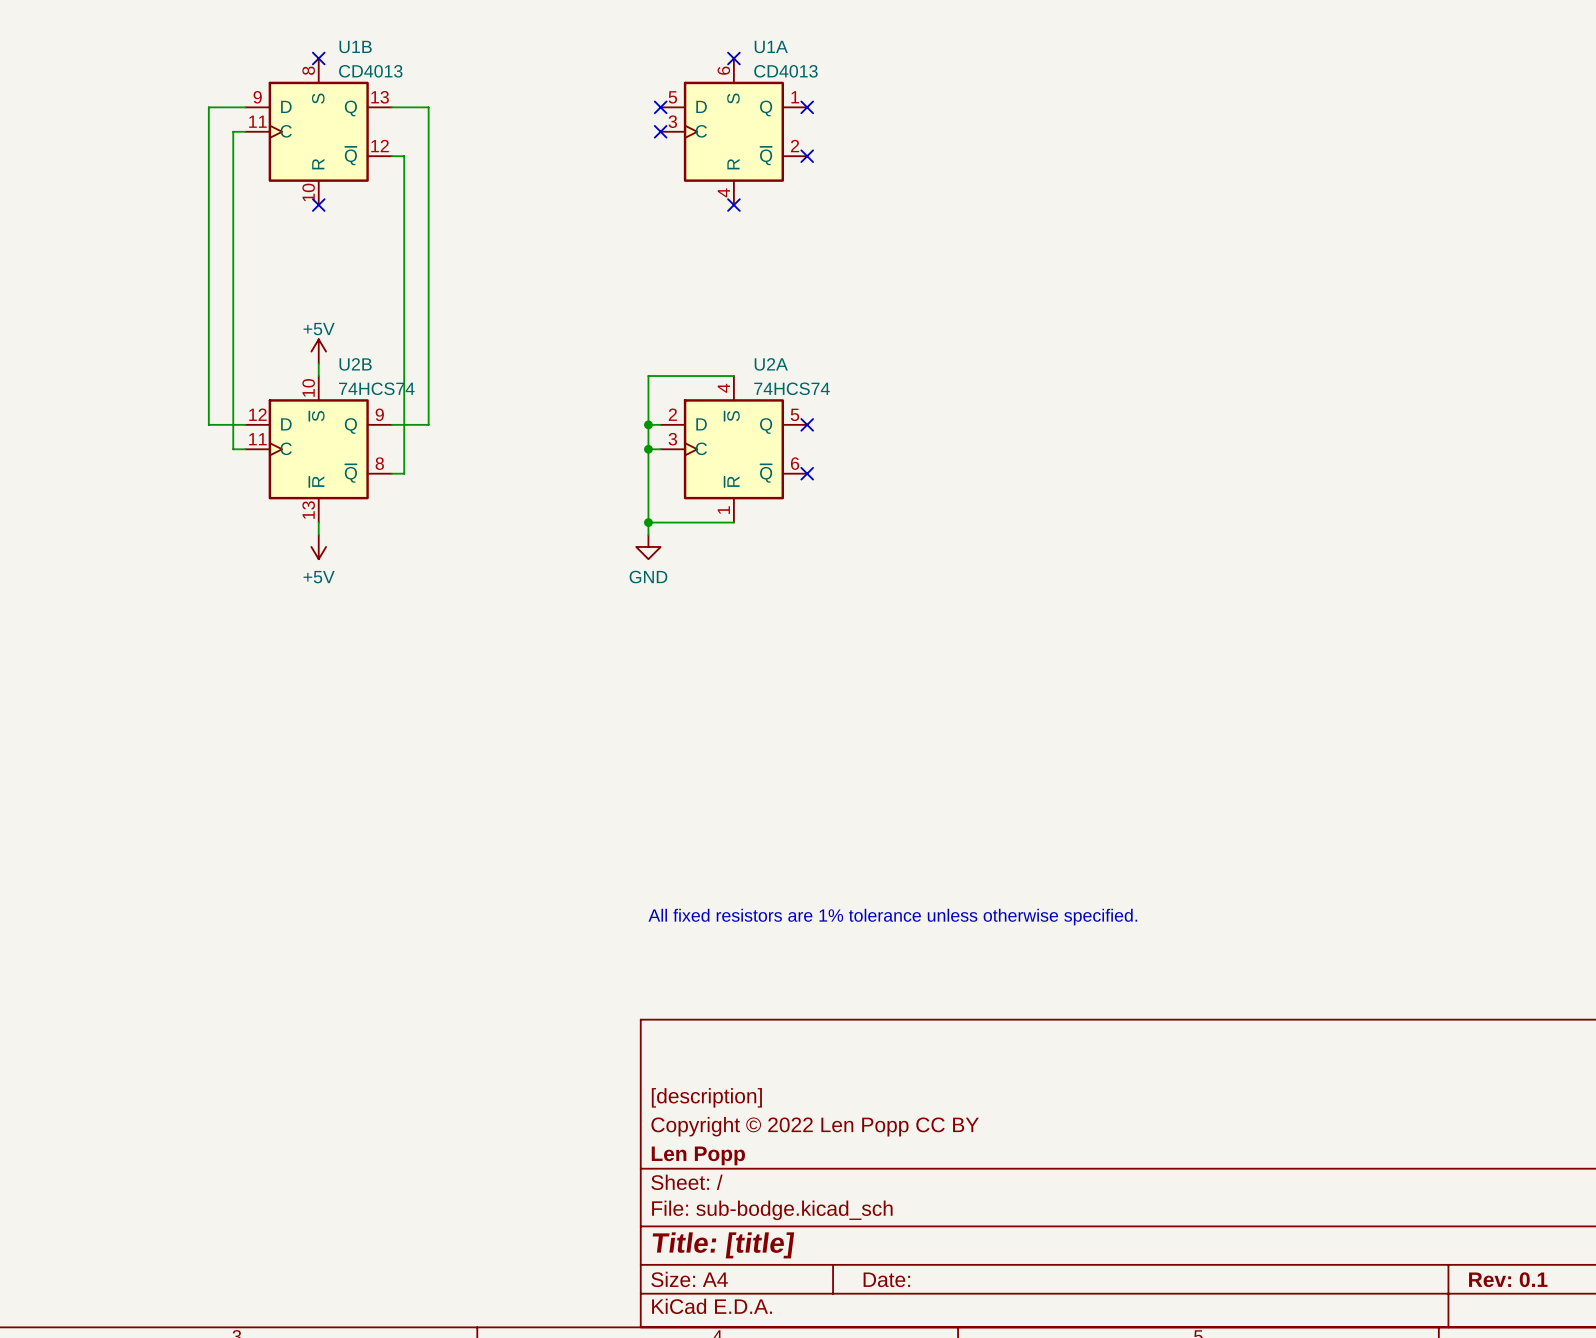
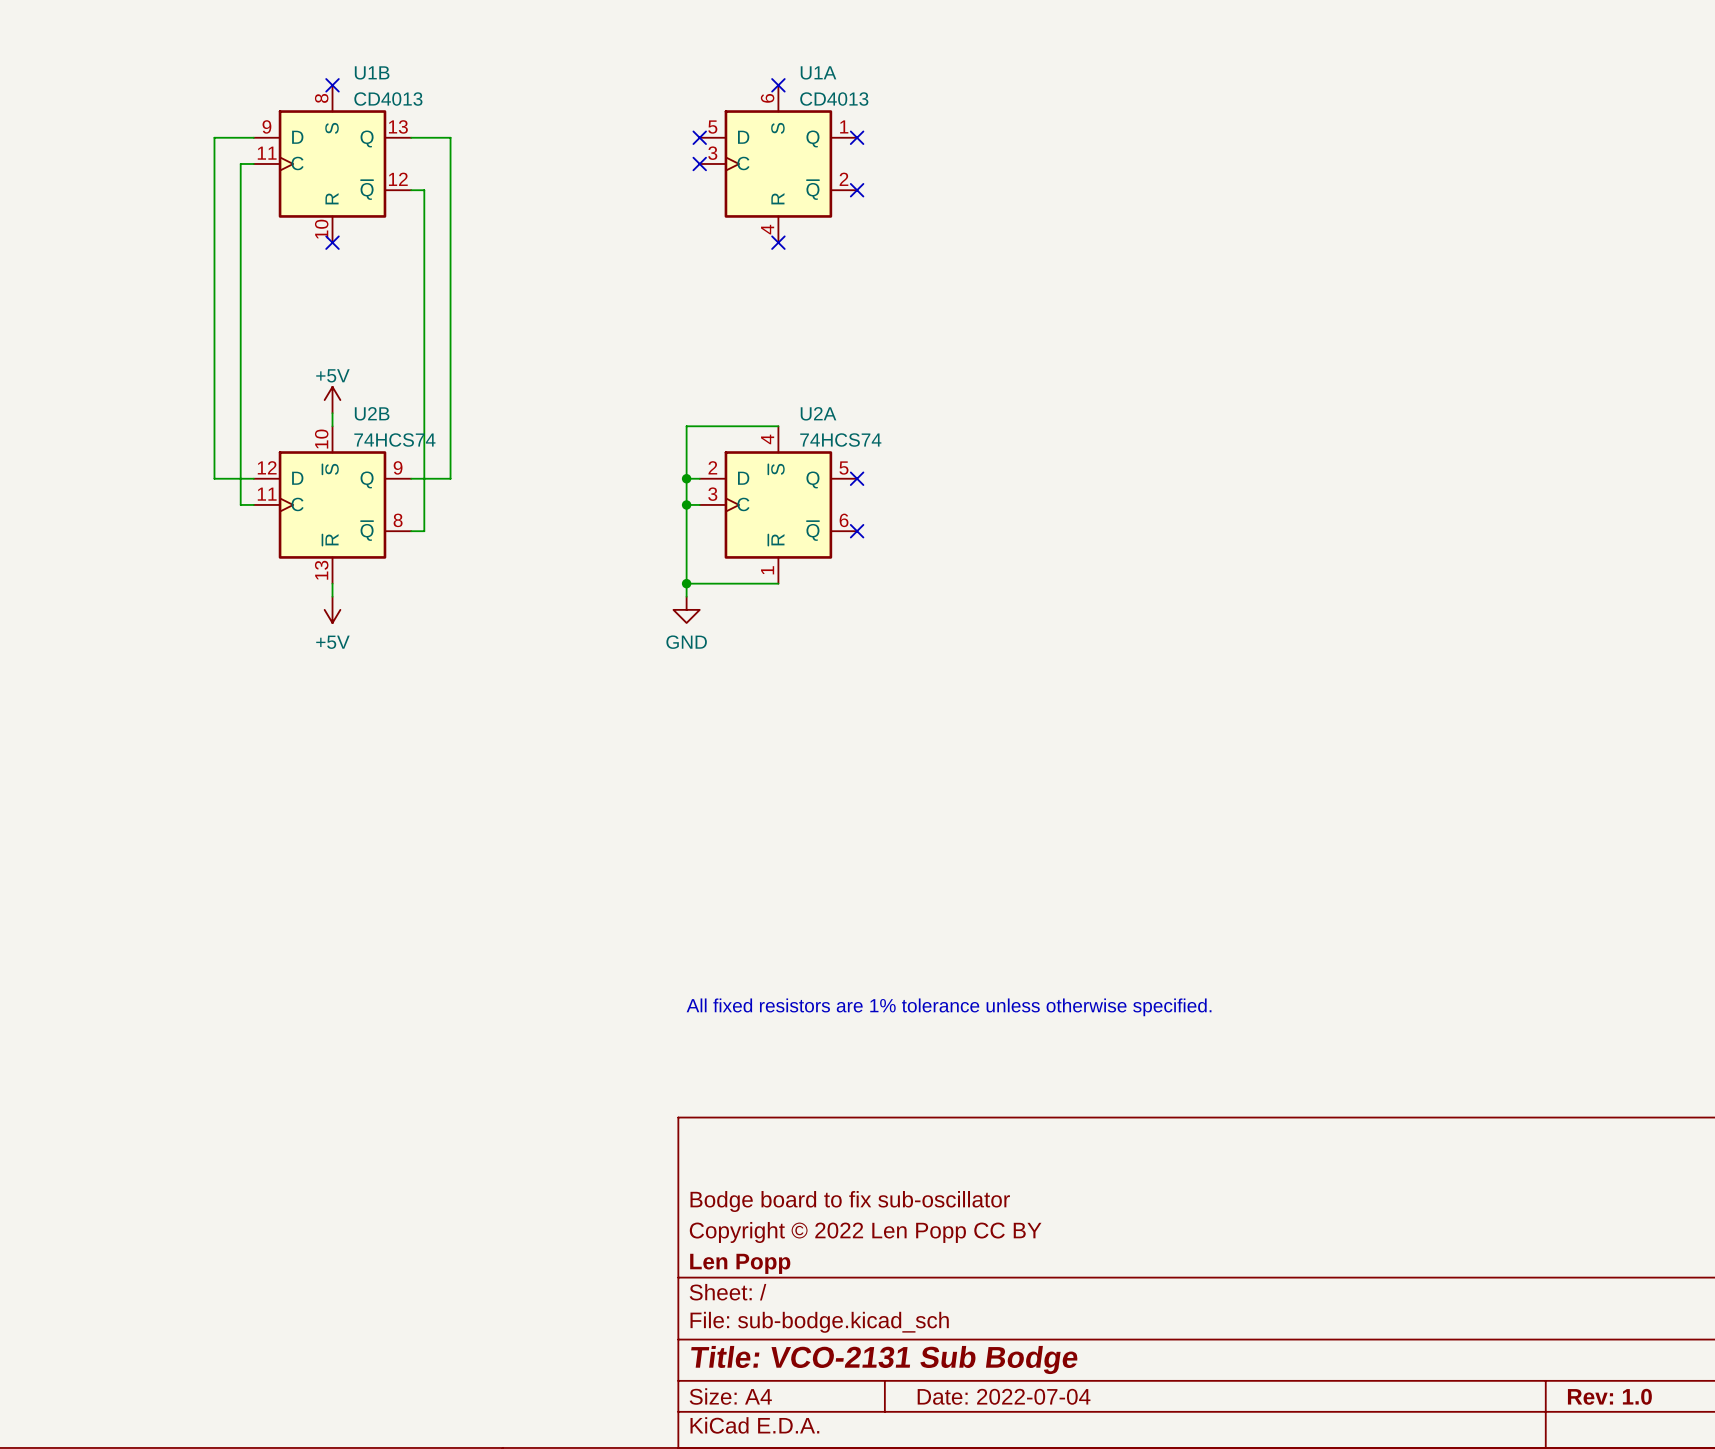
title block: [description] (706, 1097) -> Bodge board to fix sub-oscillator (850, 1201)
title block: Title: [title] (723, 1245) -> Title: VCO-2131 Sub Bodge (884, 1360)
title block: Date: (886, 1279) -> Date: 2022-07-04 (1004, 1396)
title block: Rev: 0.1 (1508, 1279) -> Rev: 1.0 (1609, 1396)

